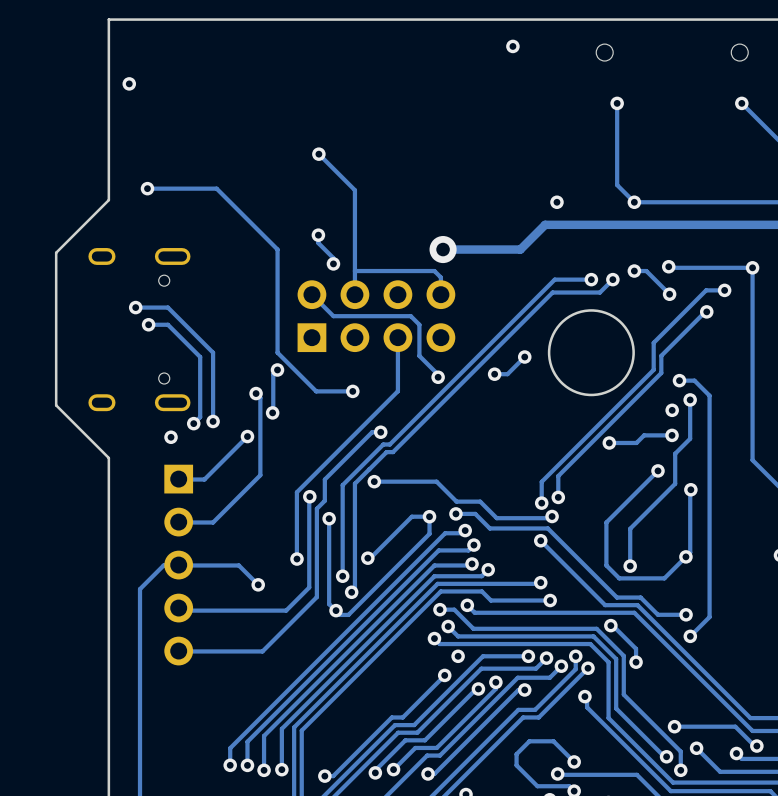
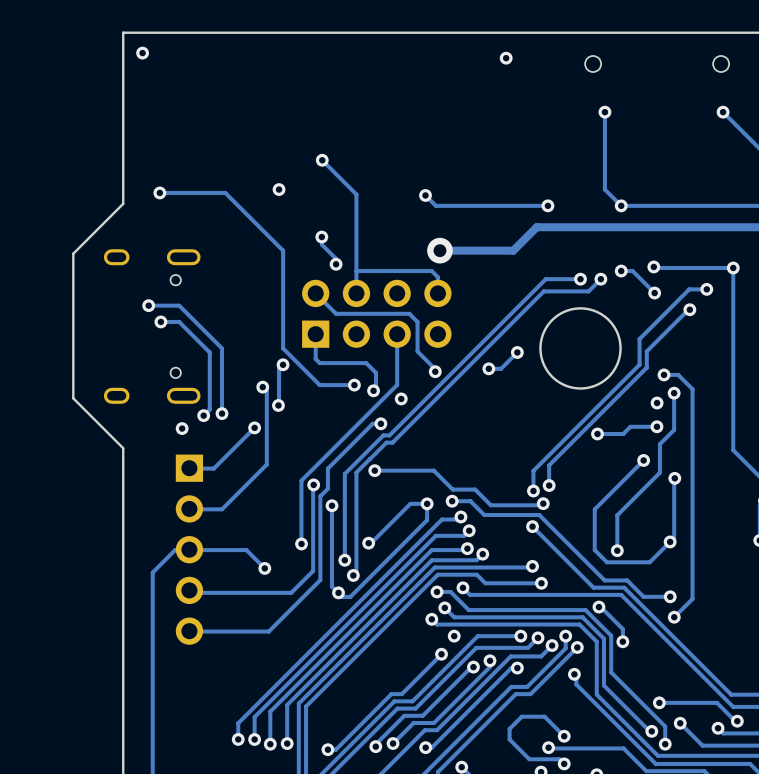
via position: (129, 83) -> (142, 53)
via: none -> (279, 189)
track: none -> (425, 195) (435, 205) (547, 205)
via: none -> (425, 195)
track: none -> (315, 334) (315, 359) (319, 363) (366, 363) (376, 372) (376, 388) (373, 390)
via: none -> (373, 390)
via: none -> (401, 398)

